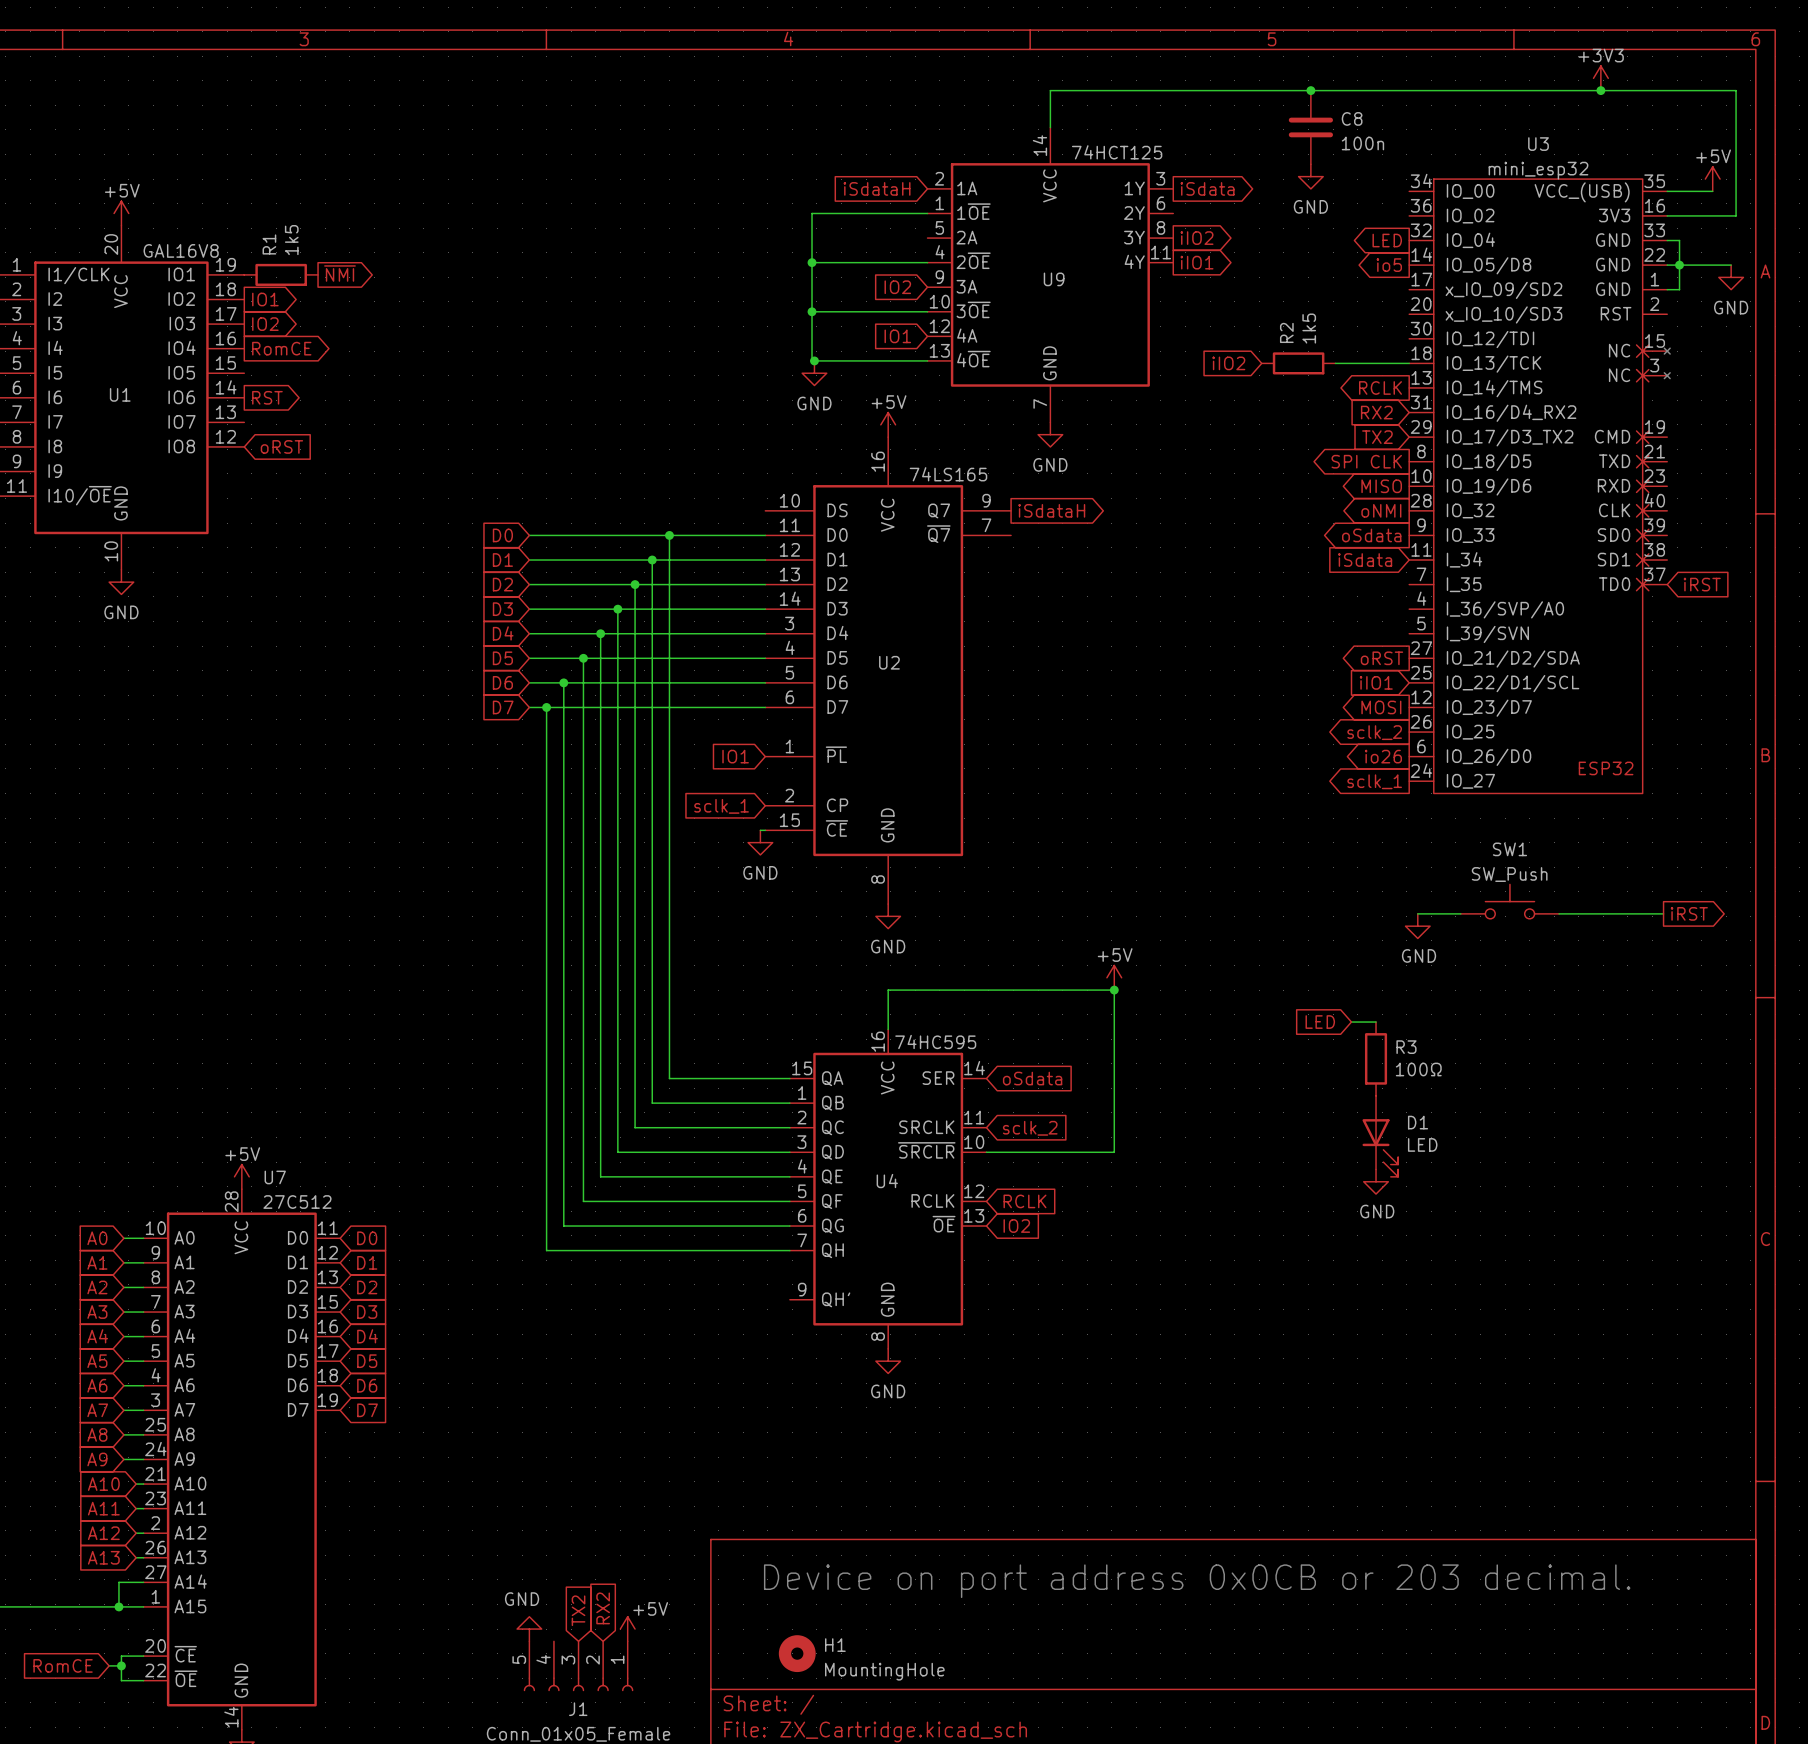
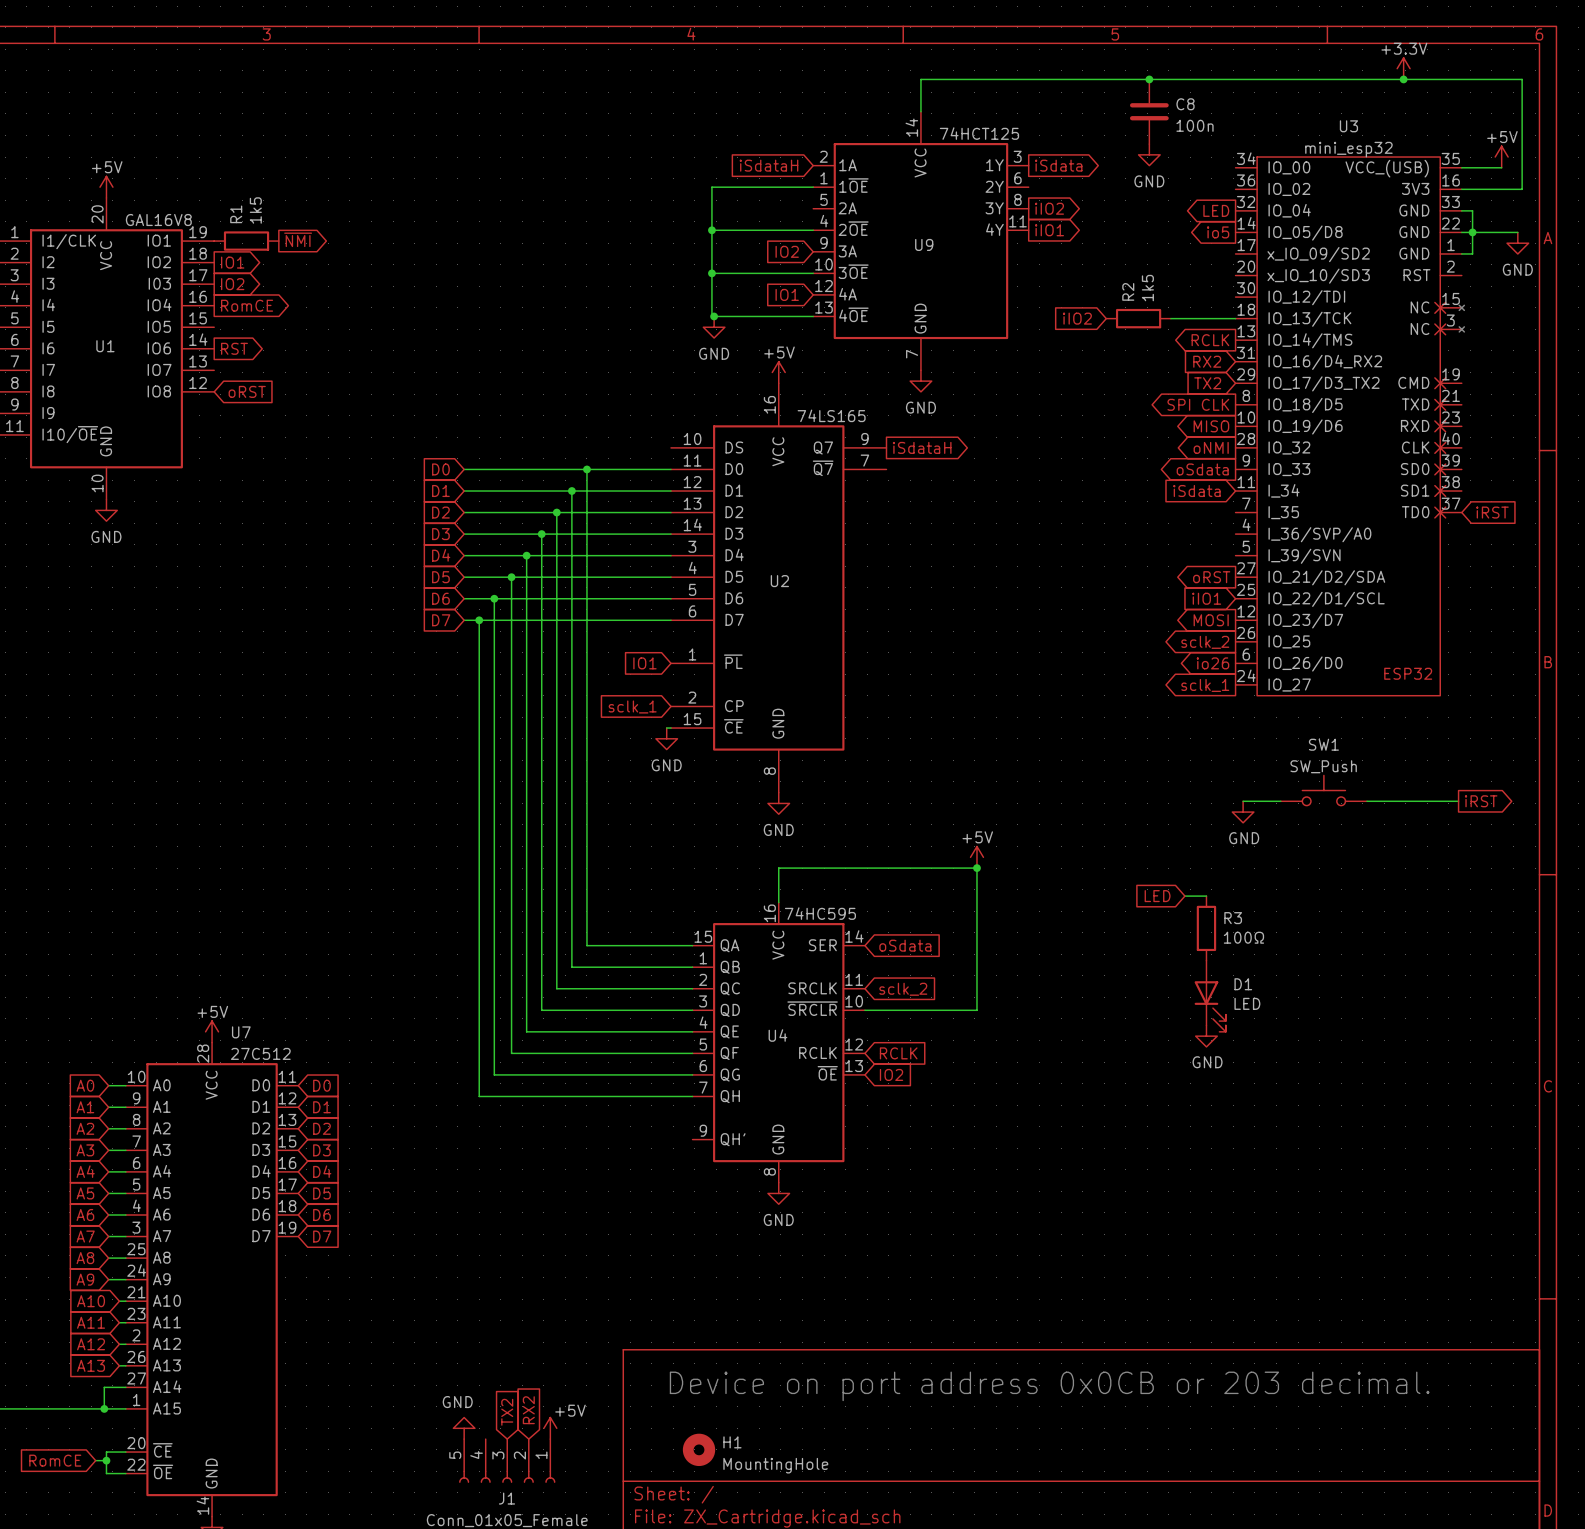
power symbol: +3V3 (1600, 78) -> +3.3V (1403, 68)

